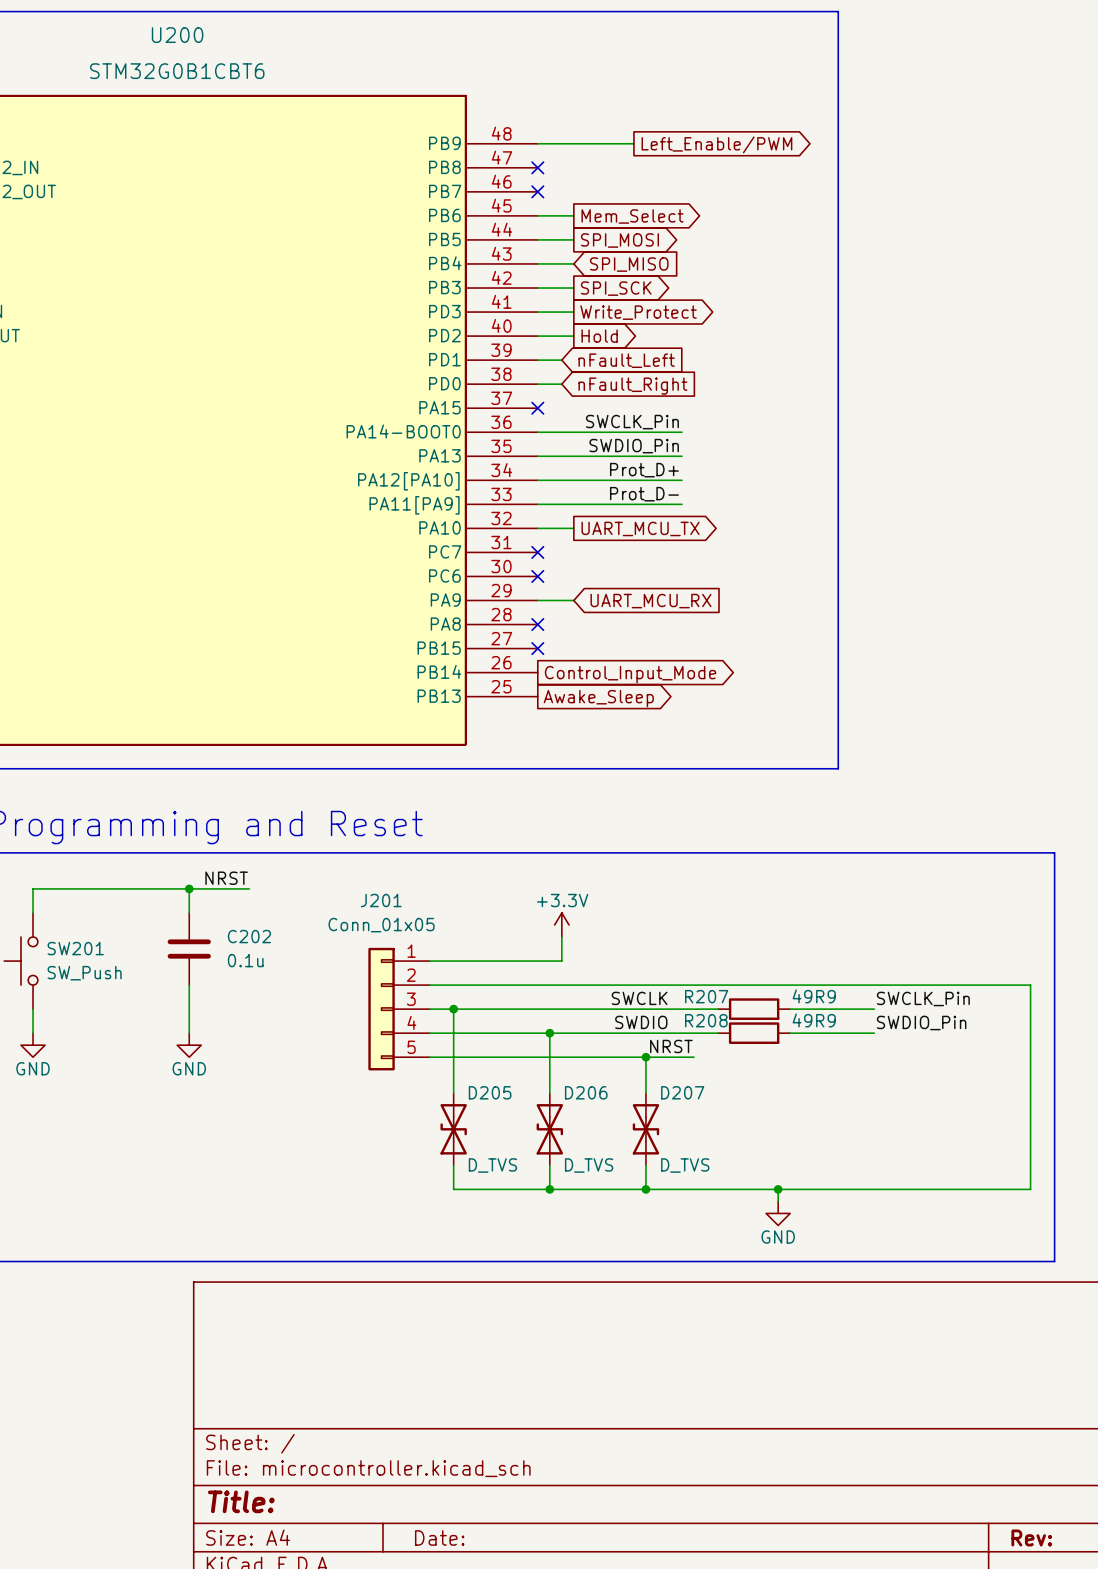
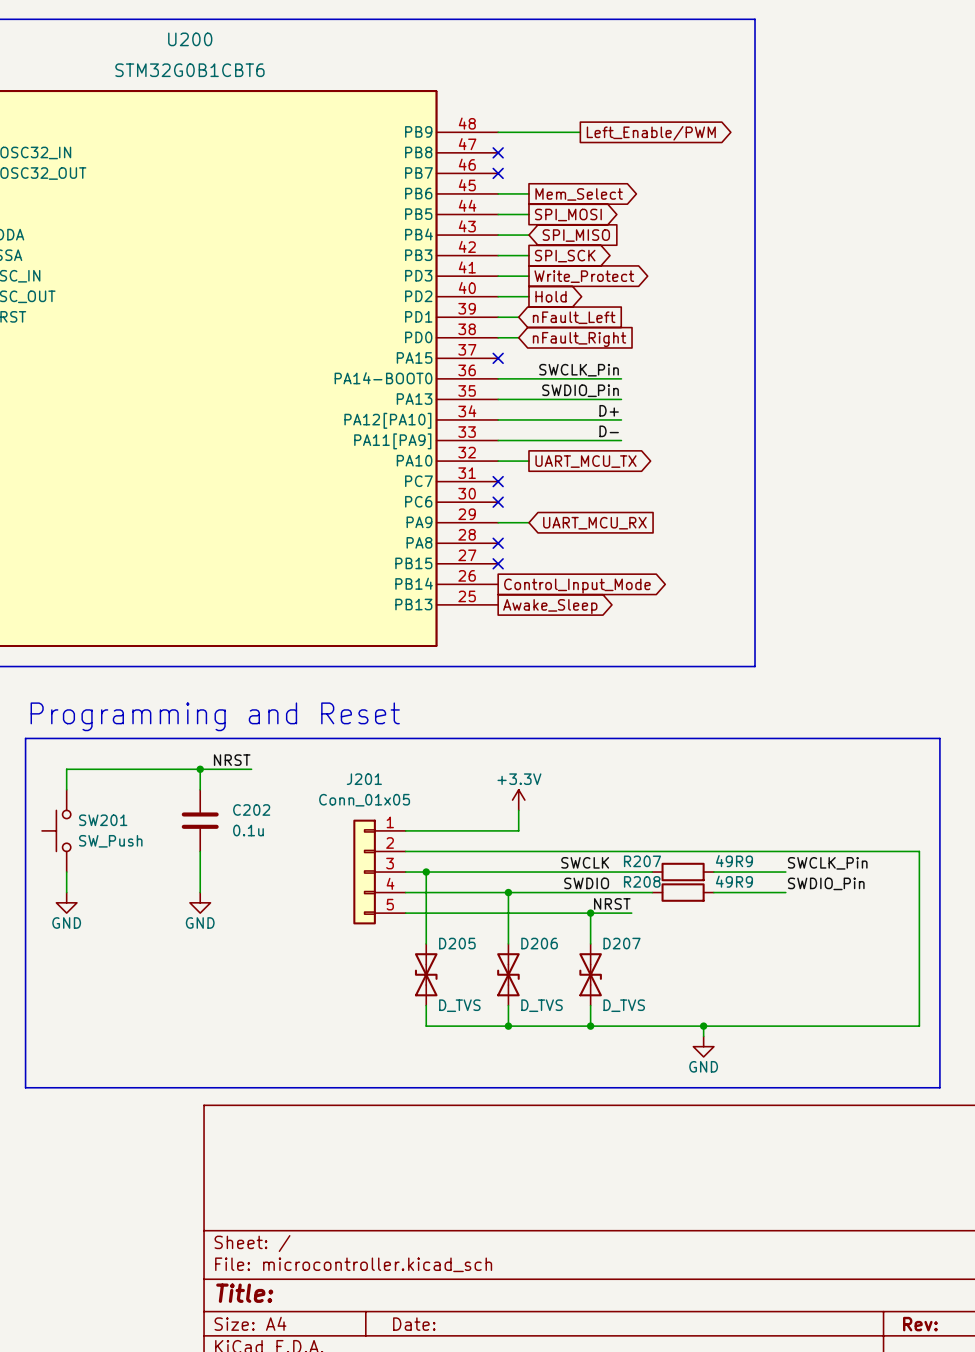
label: Prot_D+ (644, 470) -> D+ (609, 410)
label: Prot_D- (644, 494) -> D- (609, 431)

